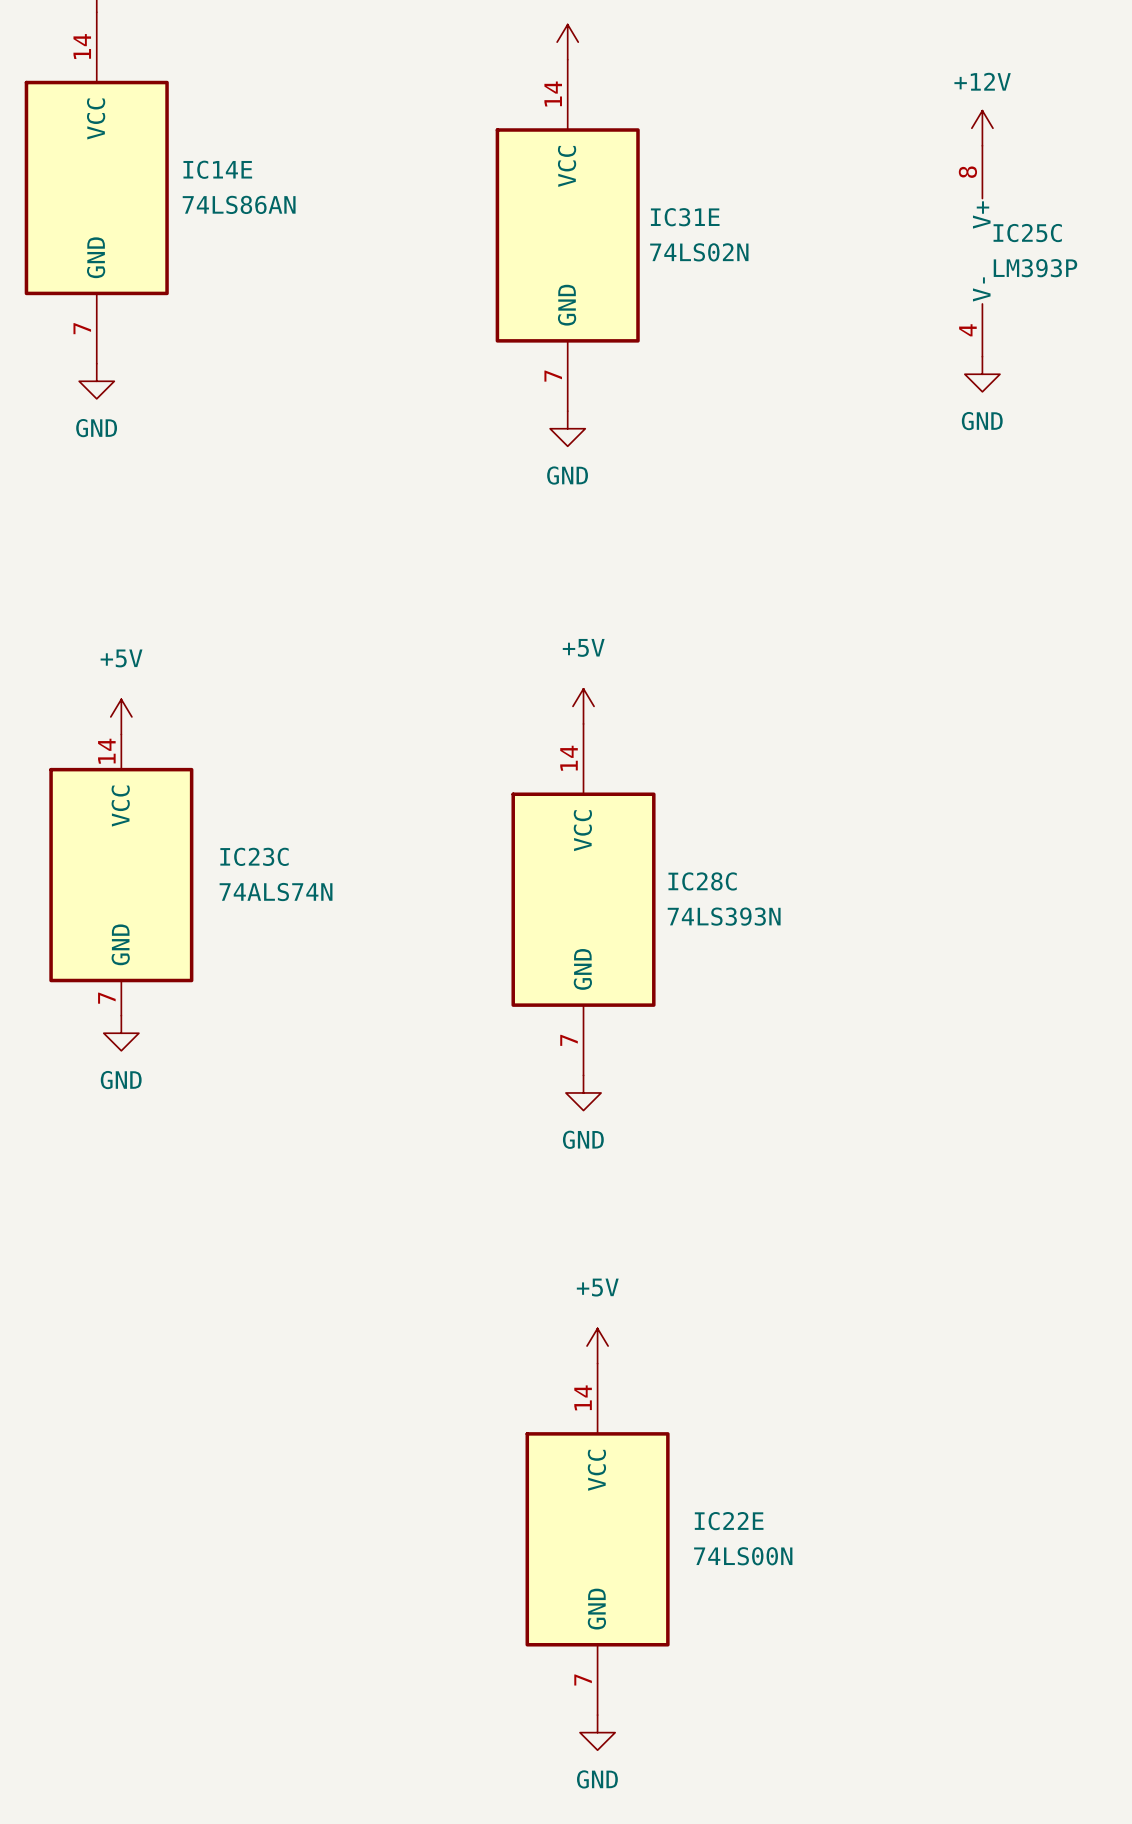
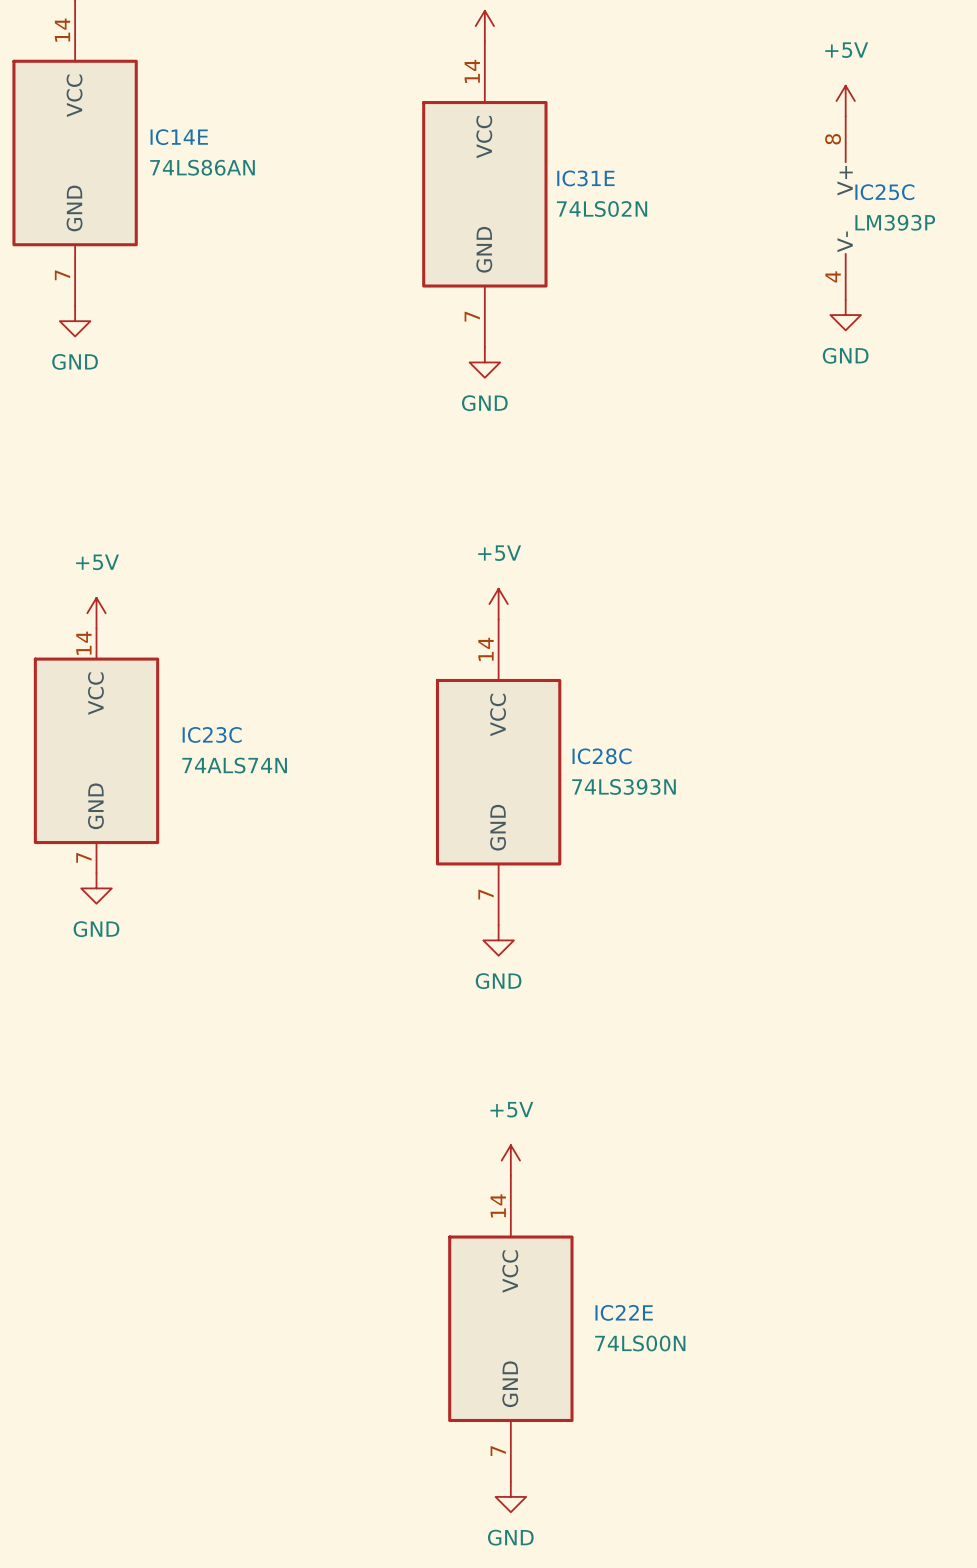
power symbol: +12V (982, 128) -> +5V (845, 101)

